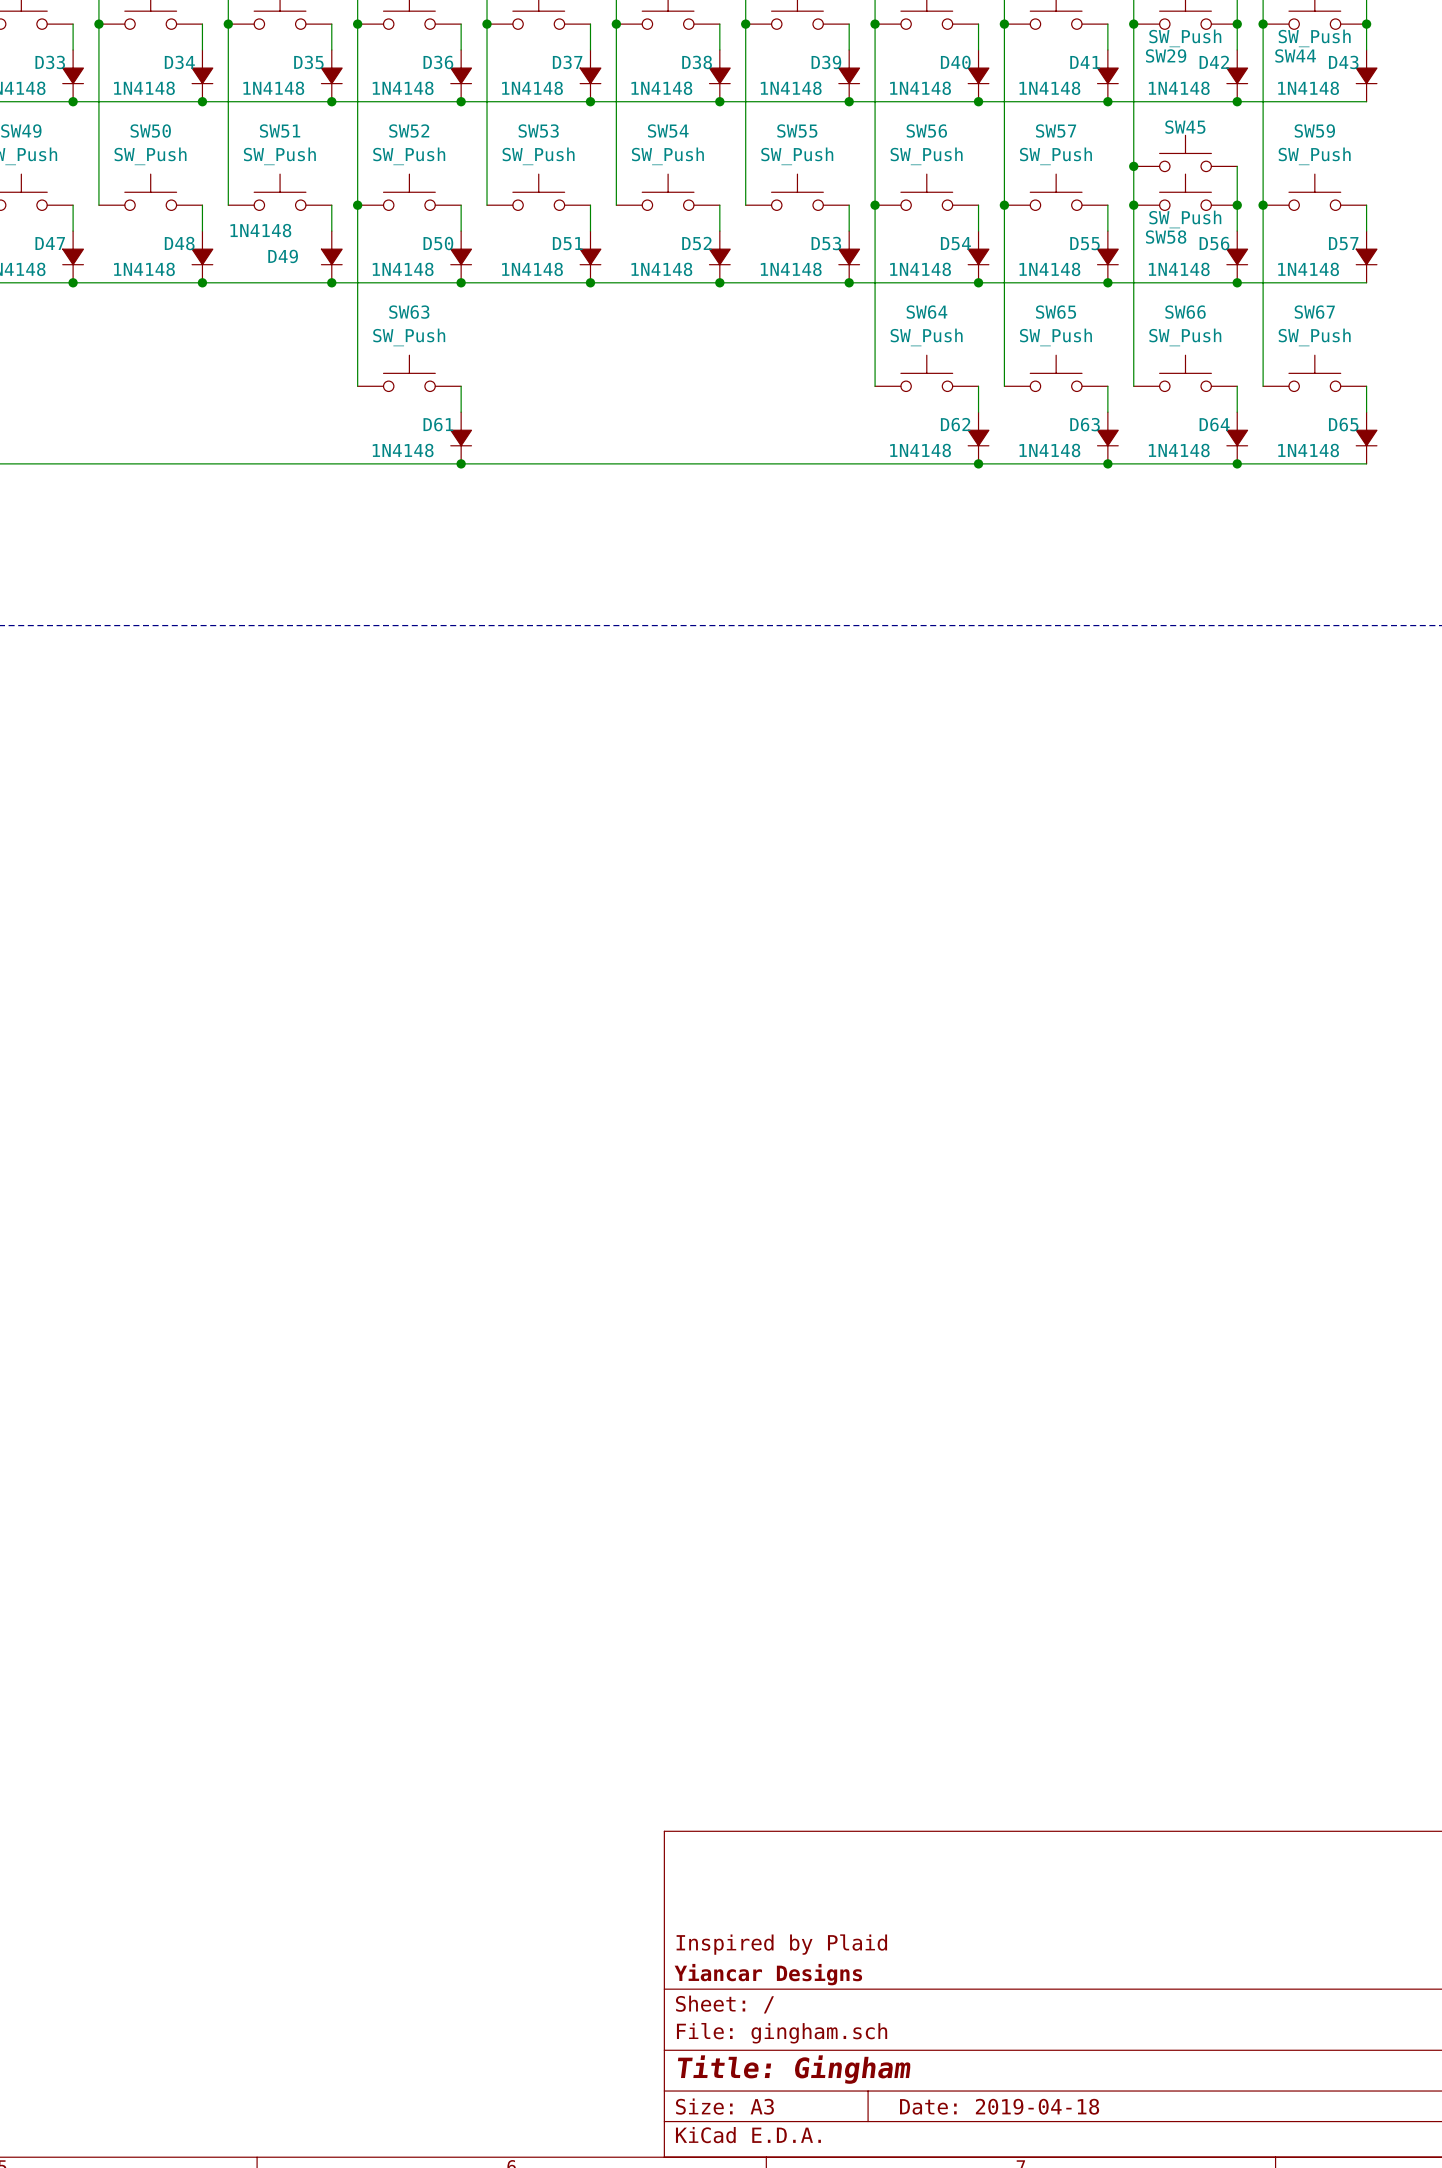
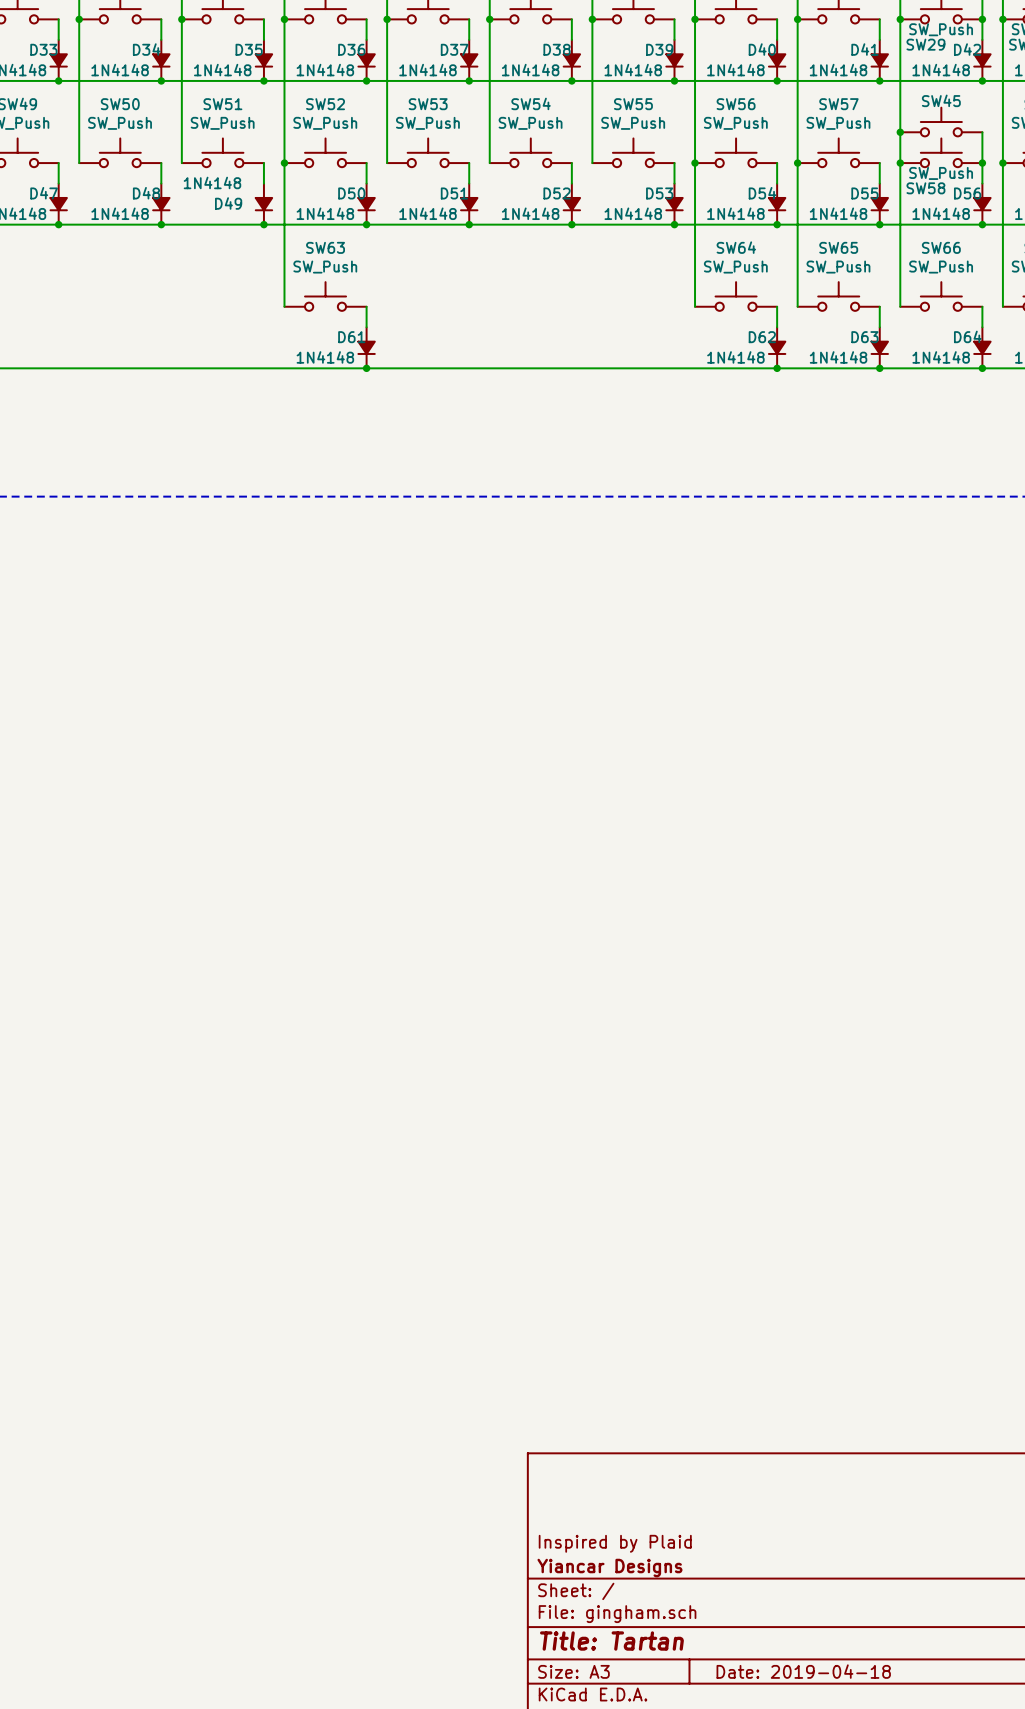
title block: Title: Gingham (794, 2069) -> Title: Tartan (611, 1641)

